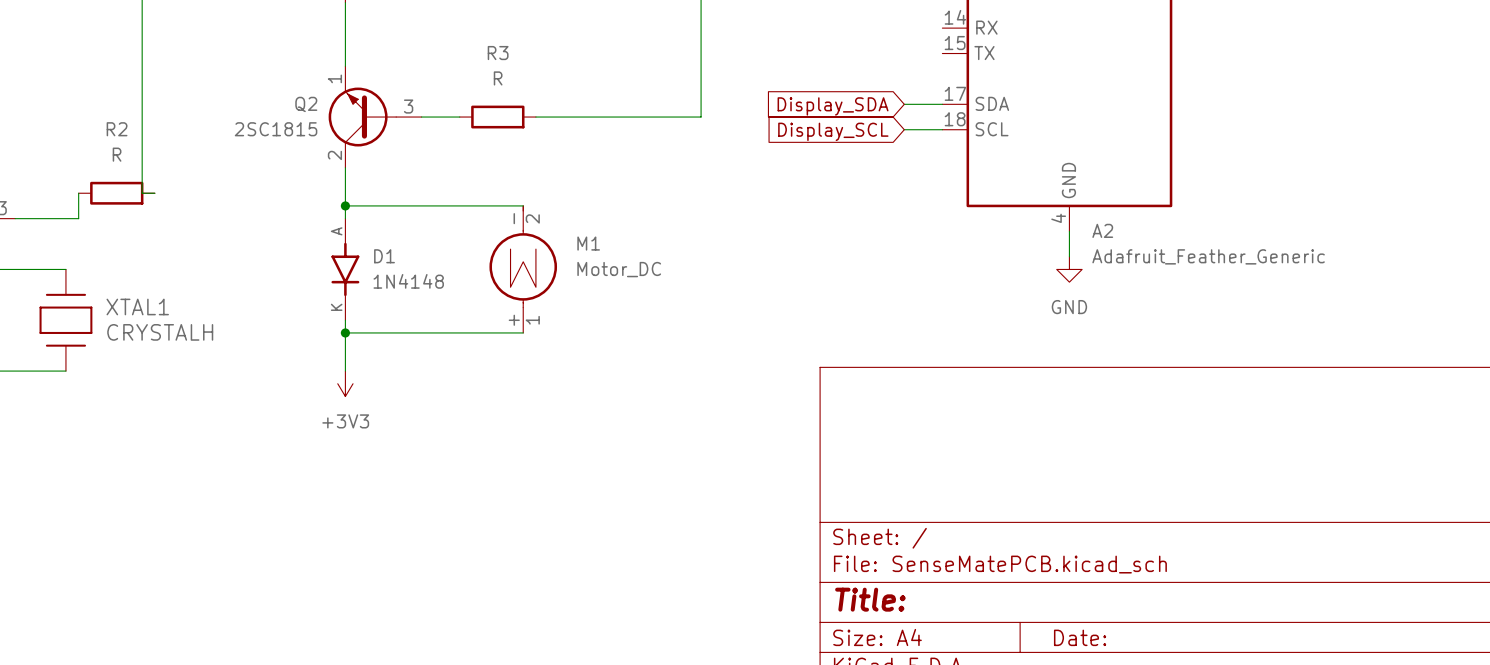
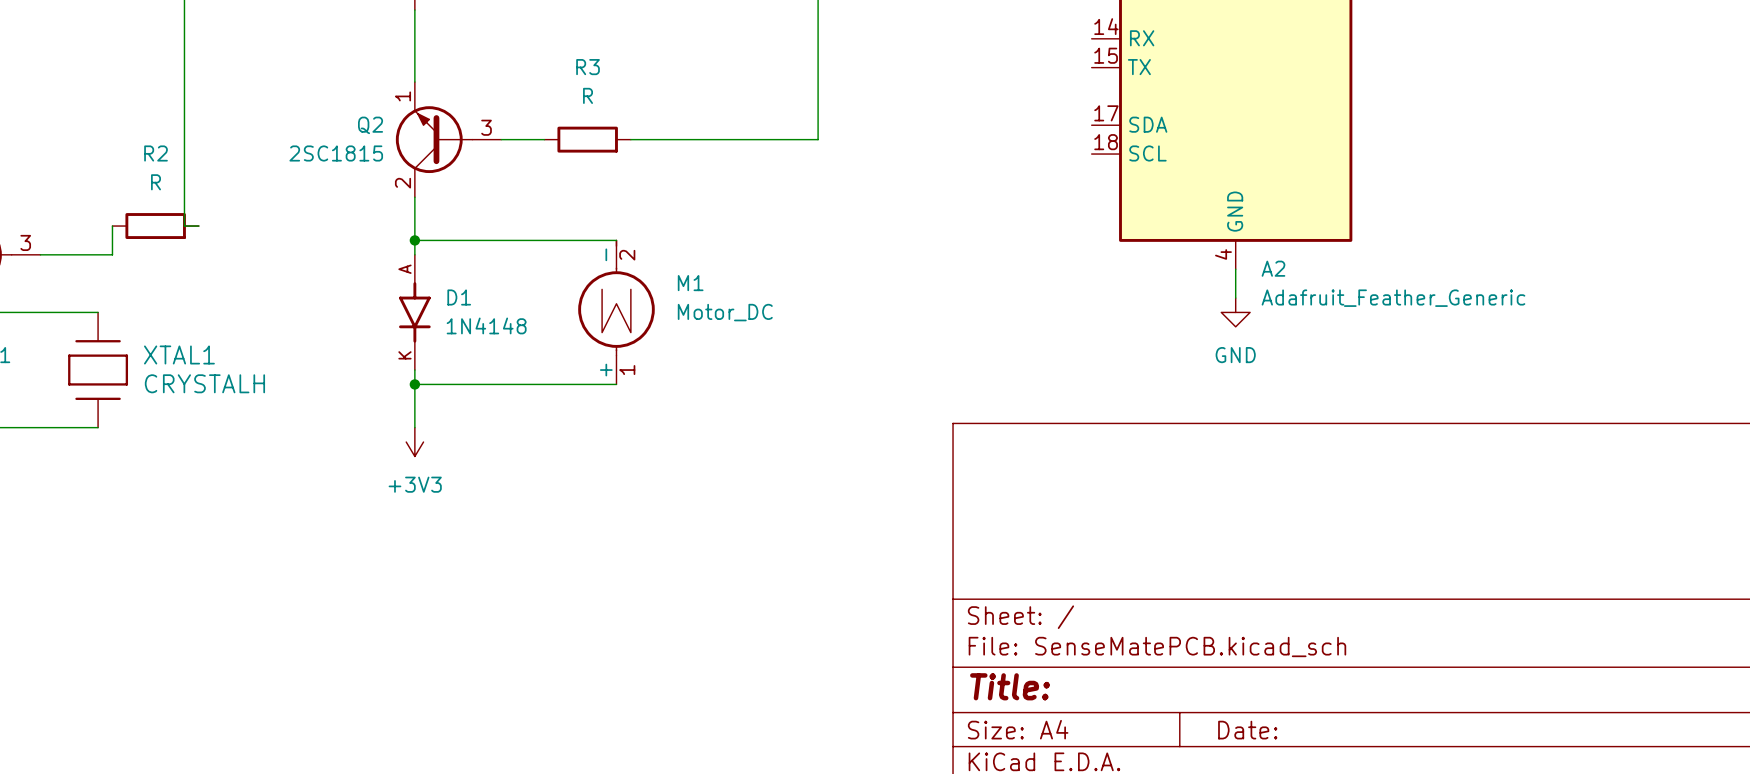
wire: (904, 104) (942, 104) -> none
global label: Display_SDA (833, 106) -> none
wire: (904, 129) (942, 129) -> none
global label: Display_SCL (833, 131) -> none

